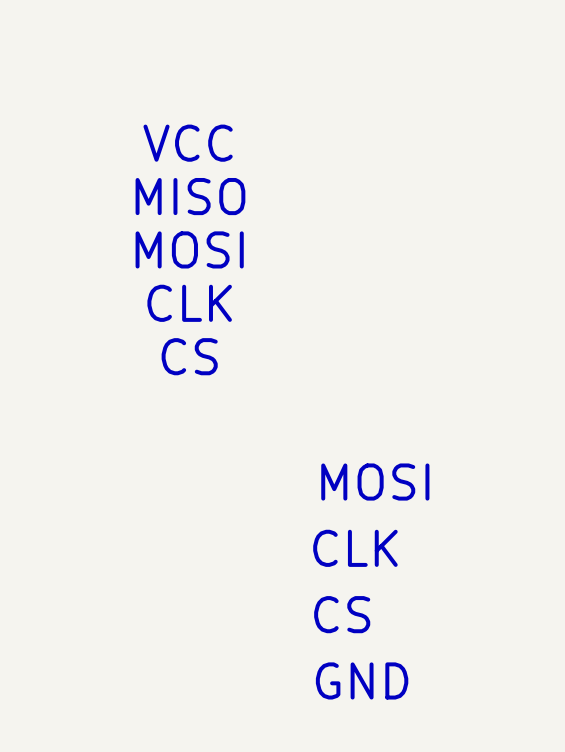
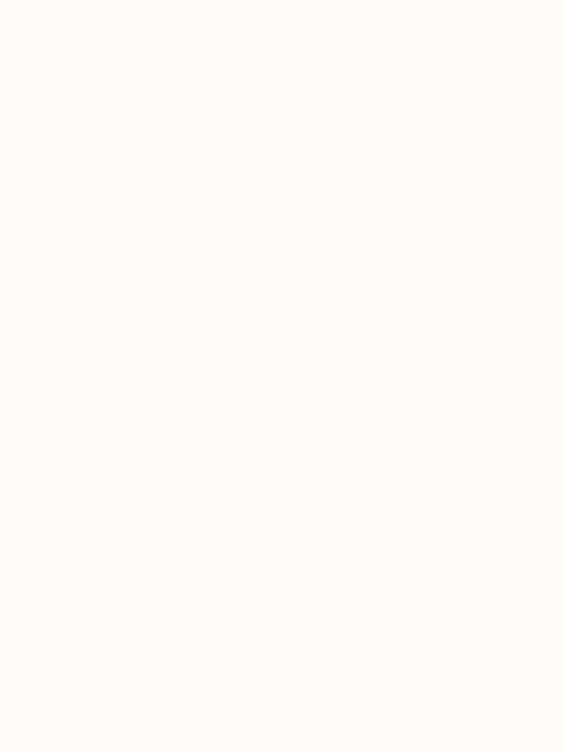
text: VCC (188, 143) -> none
text: MISO (190, 196) -> none
text: MOSI (189, 249) -> none
text: CLK (189, 303) -> none
text: CS (189, 356) -> none
text: MOSI (375, 482) -> none
text: CLK (355, 548) -> none
text: CS (342, 614) -> none
text: GND (362, 680) -> none

